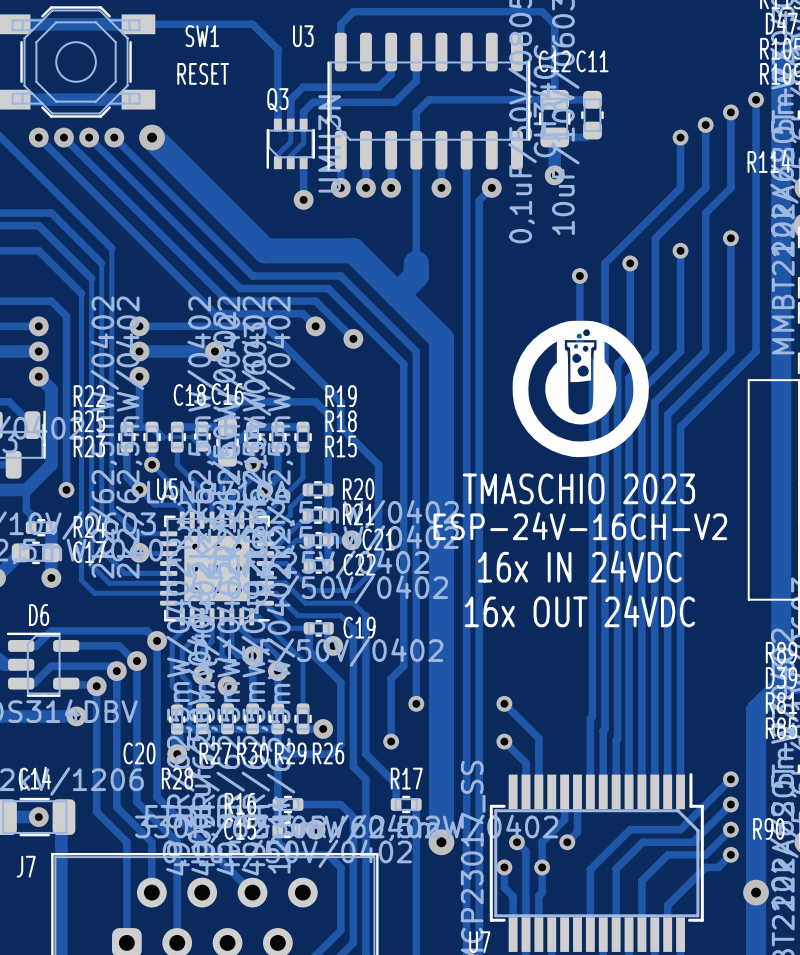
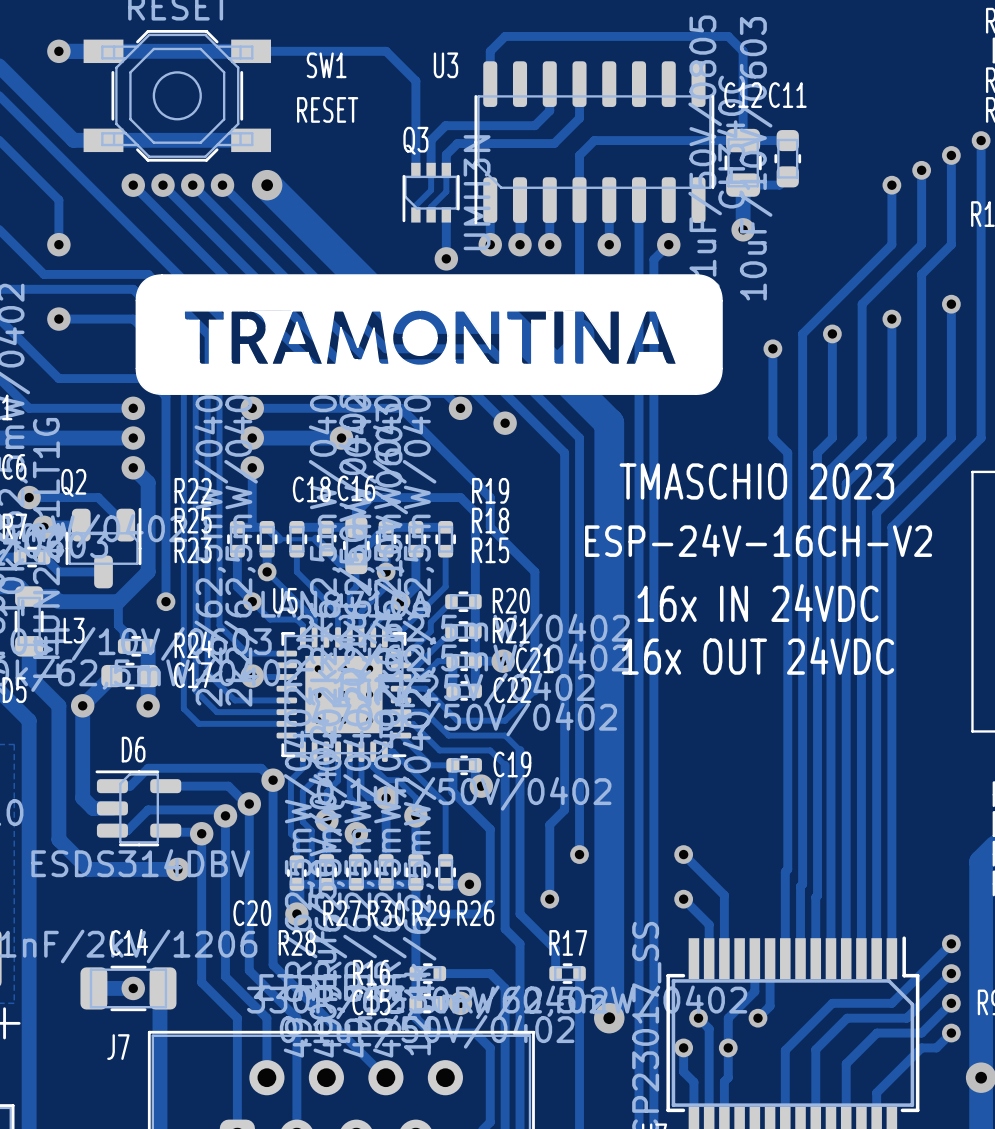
drawing: none -> [135, 274, 723, 395]
drawing: [512, 320, 649, 458] -> none
text: none -> TMASCHIO 2023 (756, 481)
text: none -> ESP-24V-16CH-V2 (758, 540)
text: TMASCHIO 2023 (578, 488) -> 16x IN 24VDC (758, 603)
text: ESP-24V-16CH-V2 (580, 526) -> 16x OUT 24VDC (758, 655)
text: 16x IN 24VDC (579, 566) -> none
text: 16x OUT 24VDC (579, 611) -> none

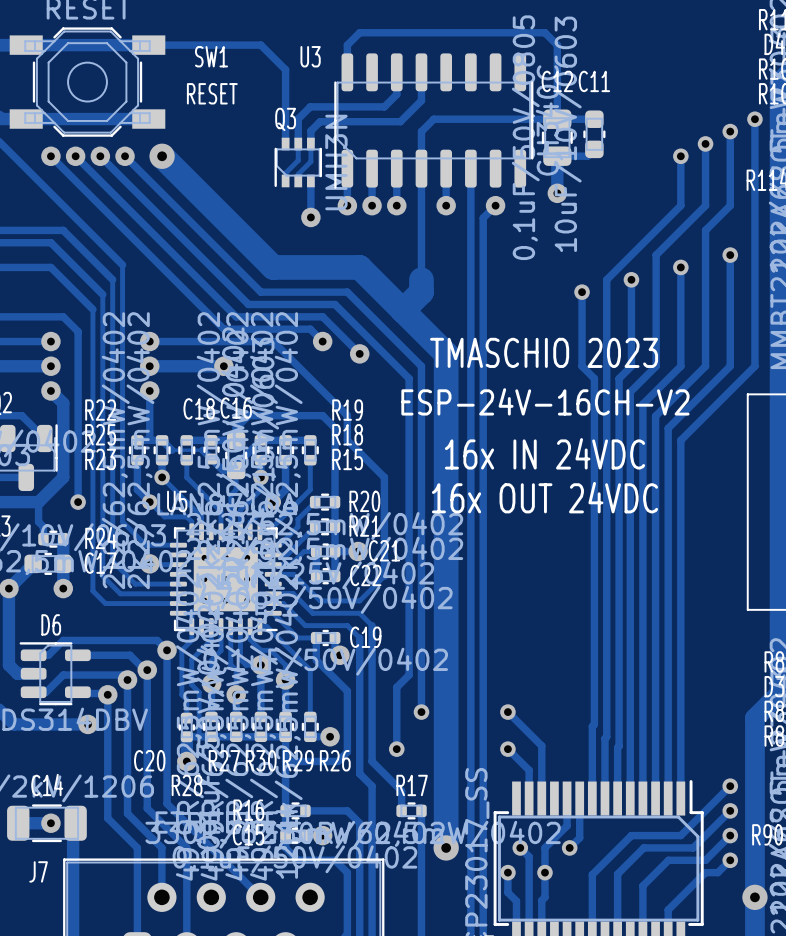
drawing: [135, 274, 723, 395] -> none
text position: TMASCHIO 2023 (756, 481) -> TMASCHIO 2023 (544, 352)
text position: ESP-24V-16CH-V2 (758, 540) -> ESP-24V-16CH-V2 (545, 401)
text position: 16x IN 24VDC (758, 603) -> 16x IN 24VDC (544, 453)
text position: 16x OUT 24VDC (758, 655) -> 16x OUT 24VDC (544, 497)

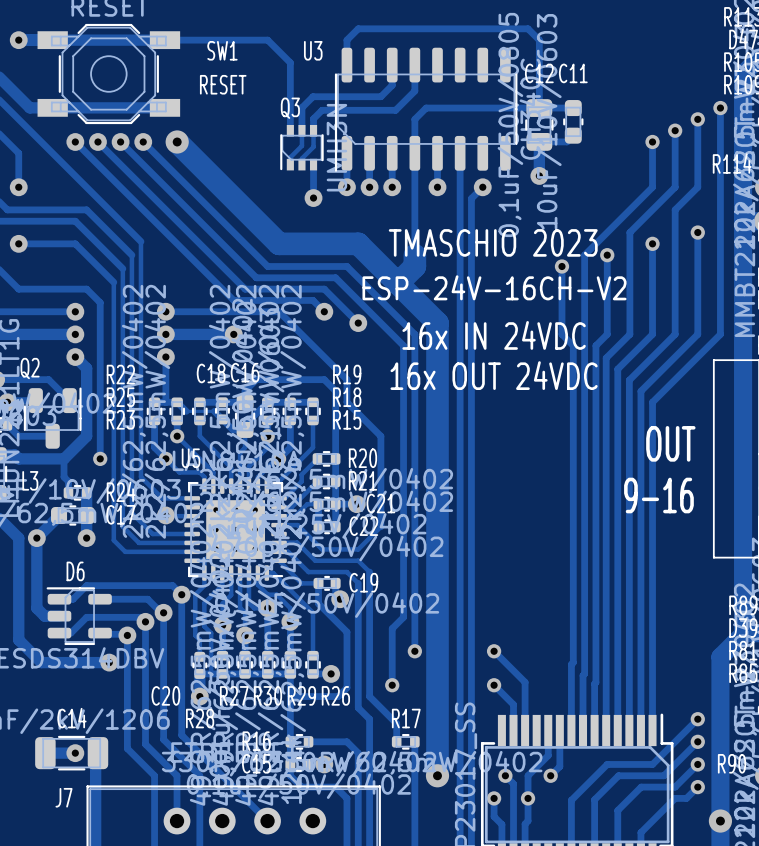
text position: TMASCHIO 2023 (544, 352) -> TMASCHIO 2023 (493, 242)
text position: ESP-24V-16CH-V2 (545, 401) -> ESP-24V-16CH-V2 (494, 287)
text position: 16x IN 24VDC (544, 453) -> 16x IN 24VDC (494, 335)
text: none -> OUT (670, 443)
text position: 16x OUT 24VDC (544, 497) -> 16x OUT 24VDC (494, 375)
text: none -> 9-16 (658, 495)

